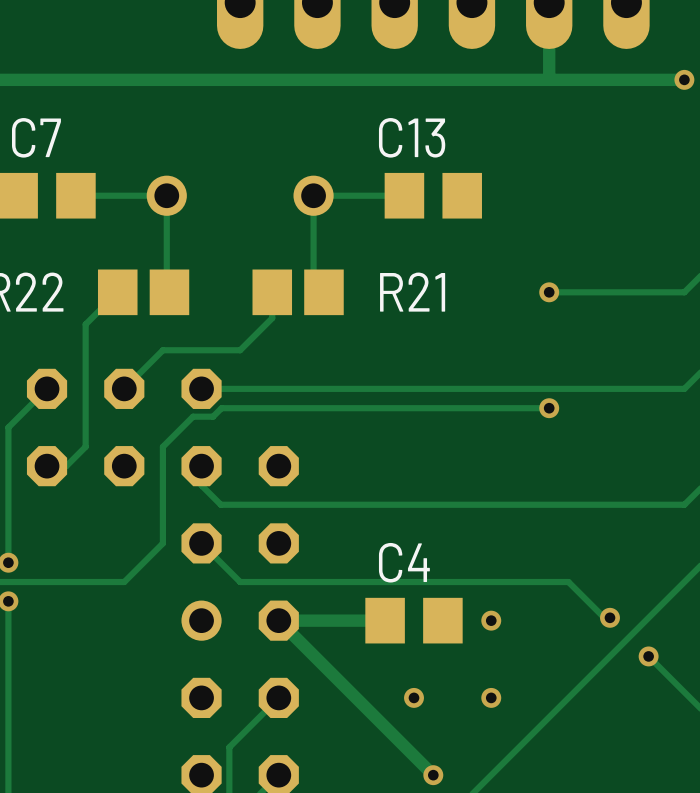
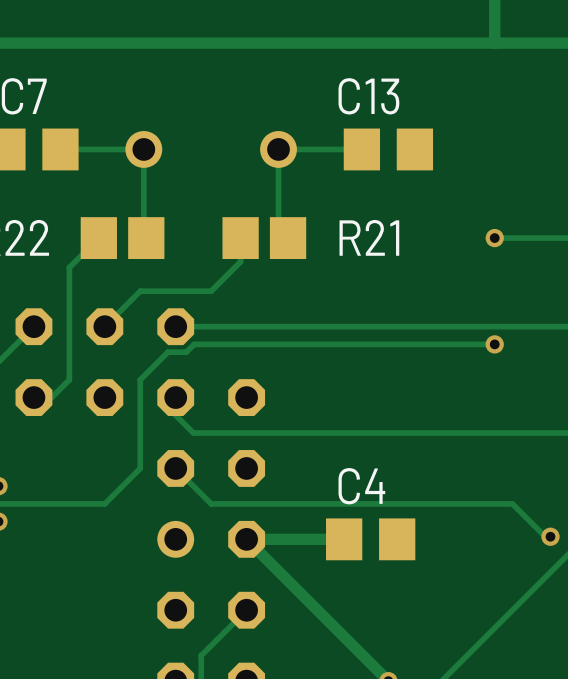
via: (491, 620) -> none
via: (414, 697) -> none
via: (491, 697) -> none

